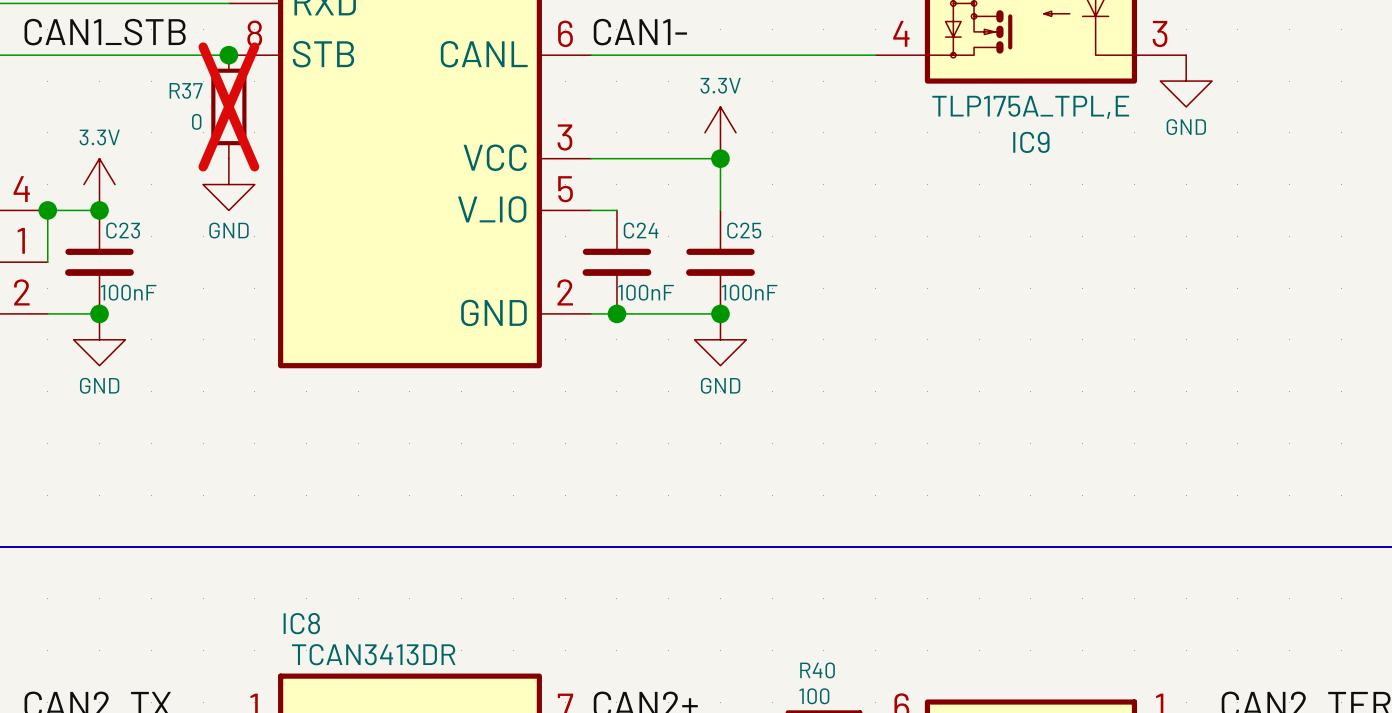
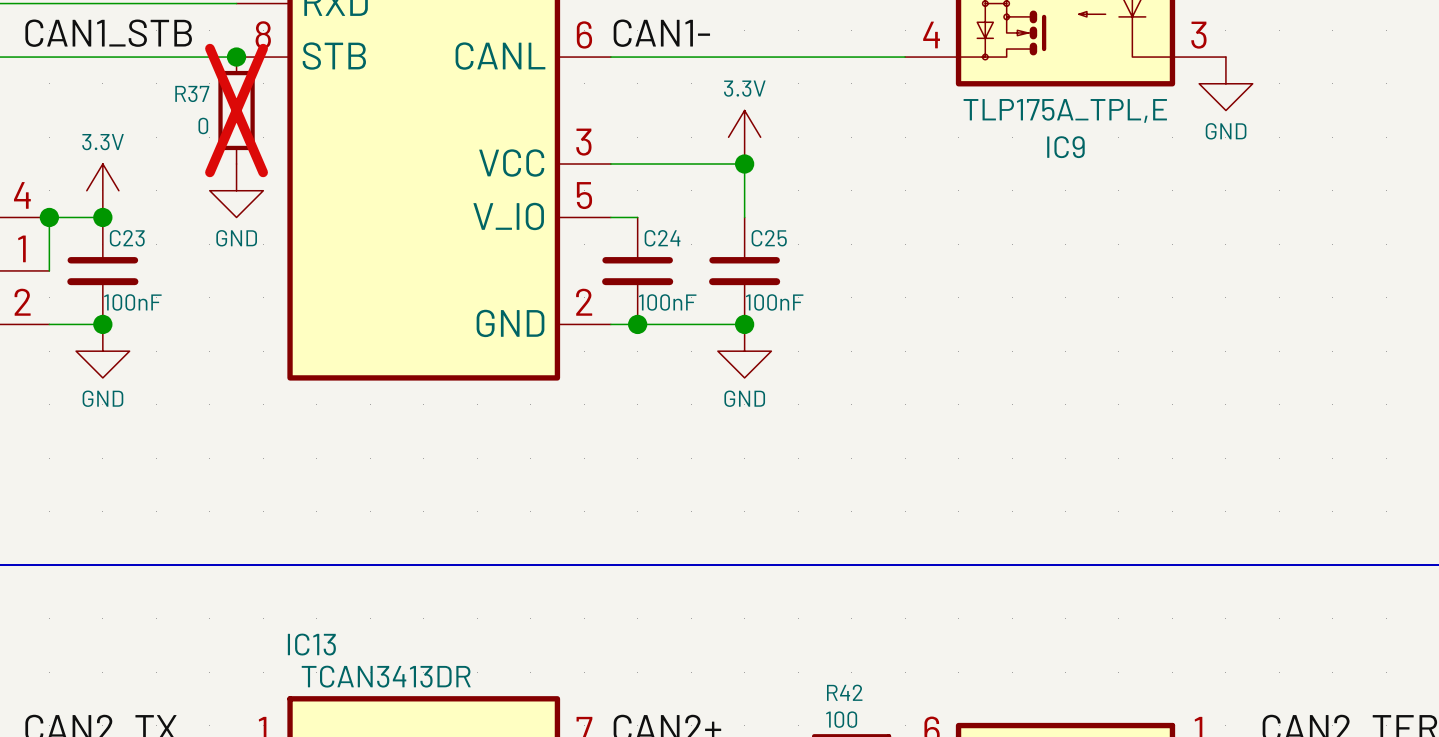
IC8 name: IC8 (301, 623) -> IC13 (311, 644)
R40 name: R40 (817, 670) -> R42 (844, 692)

